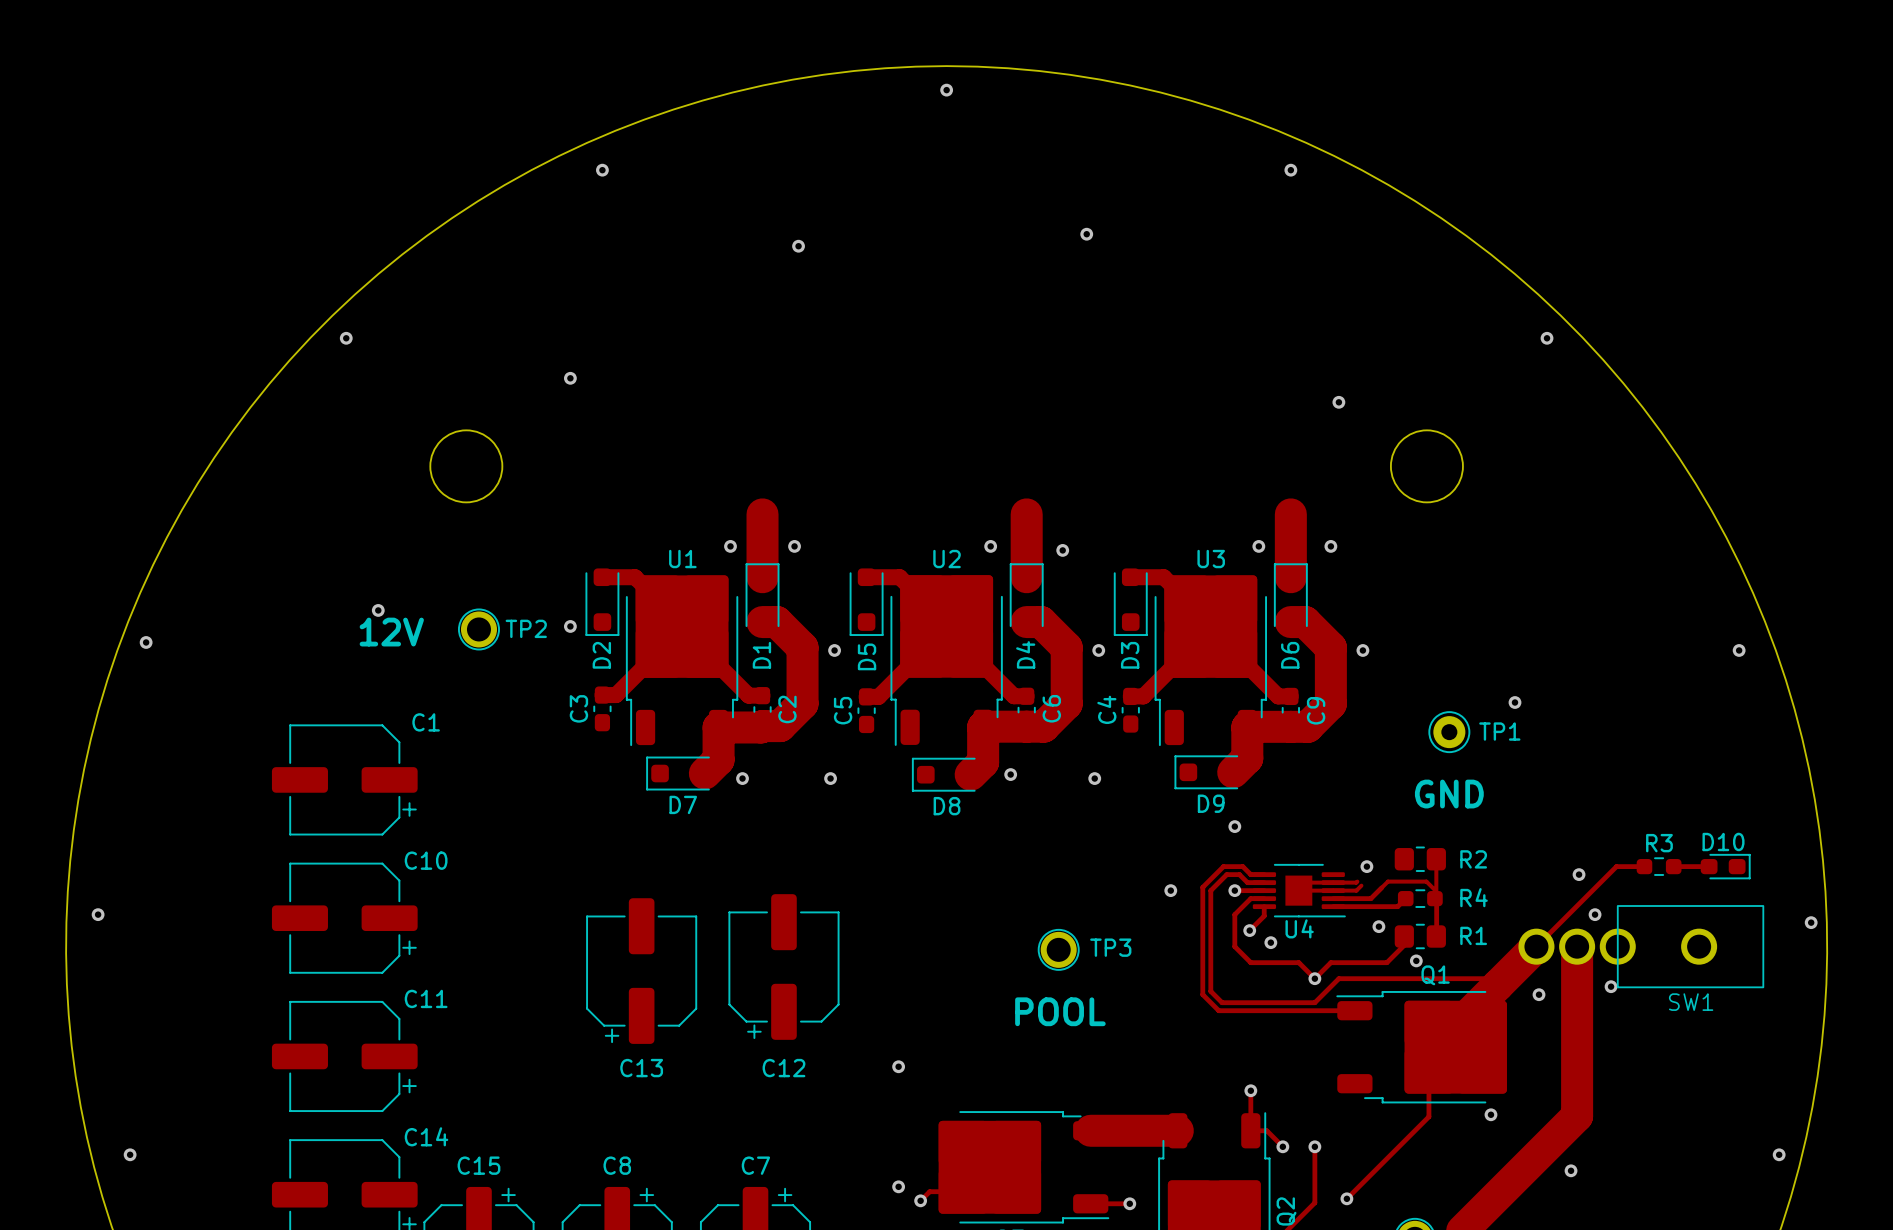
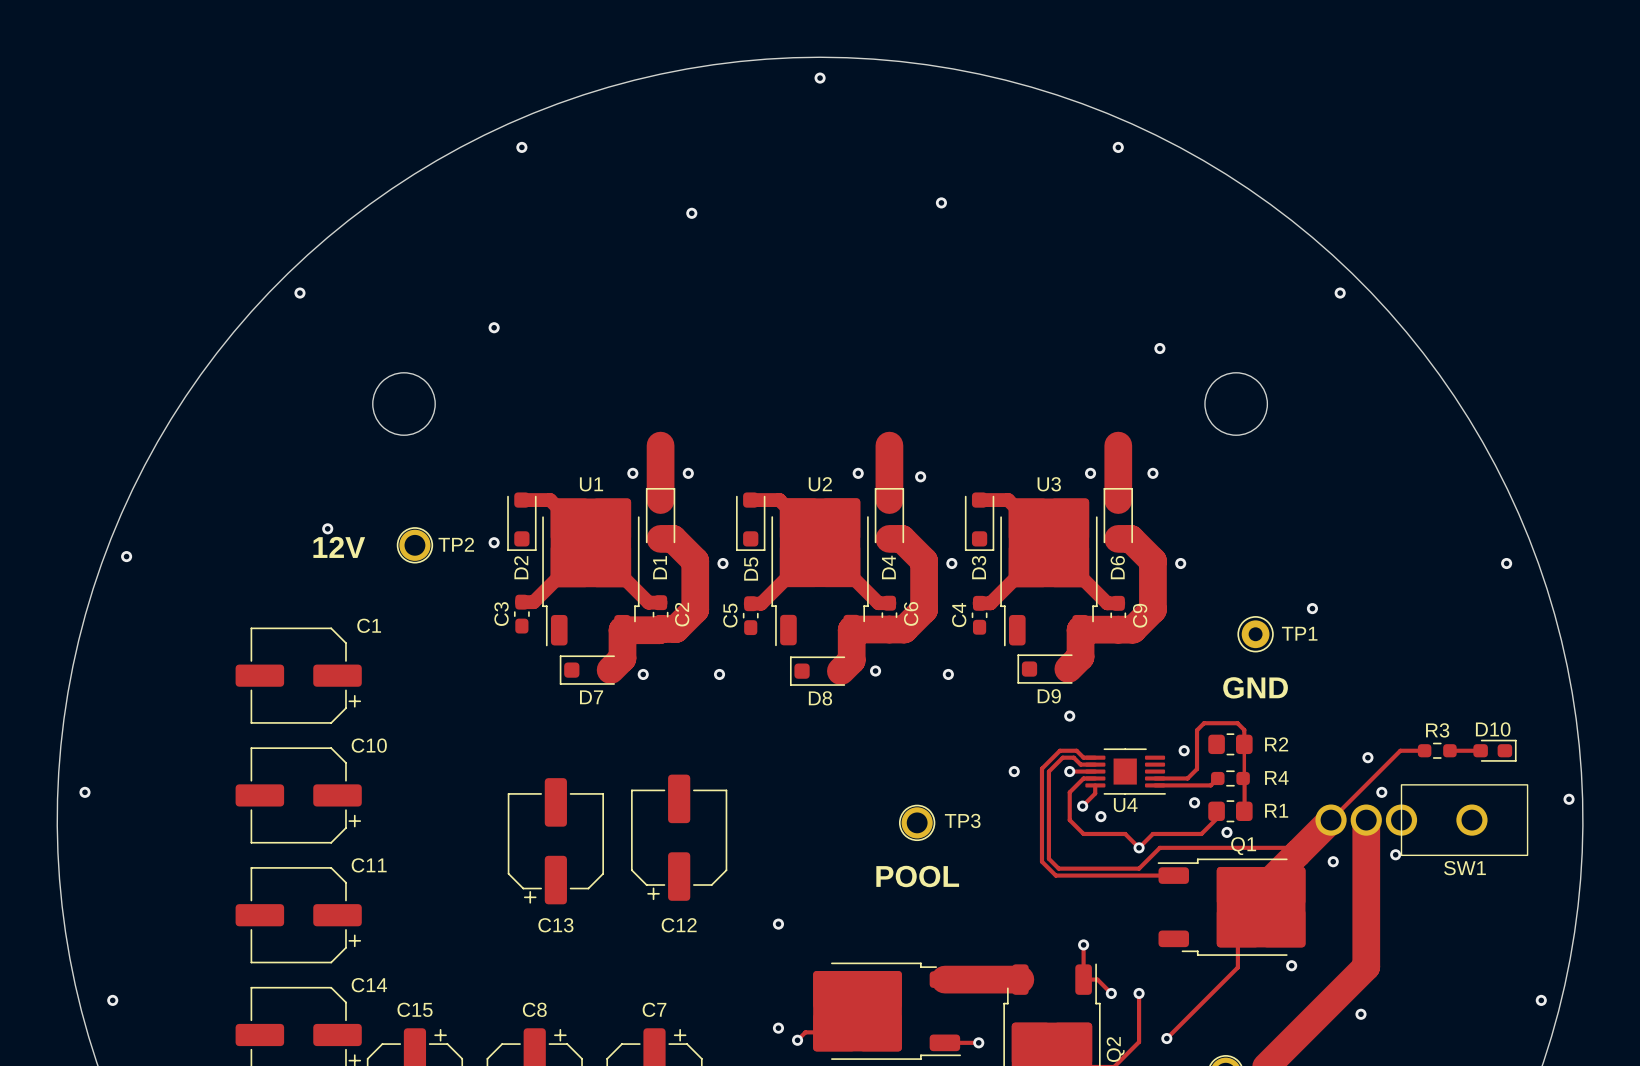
track: (1357, 881) (1306, 882) (1298, 890) (1356, 890) (1361, 885) -> none
track: (1381, 887) (1387, 881) (1426, 881) (1434, 890) (1434, 898) -> (1197, 769) (1197, 730) (1204, 723) (1237, 723) (1244, 729) (1244, 744)

